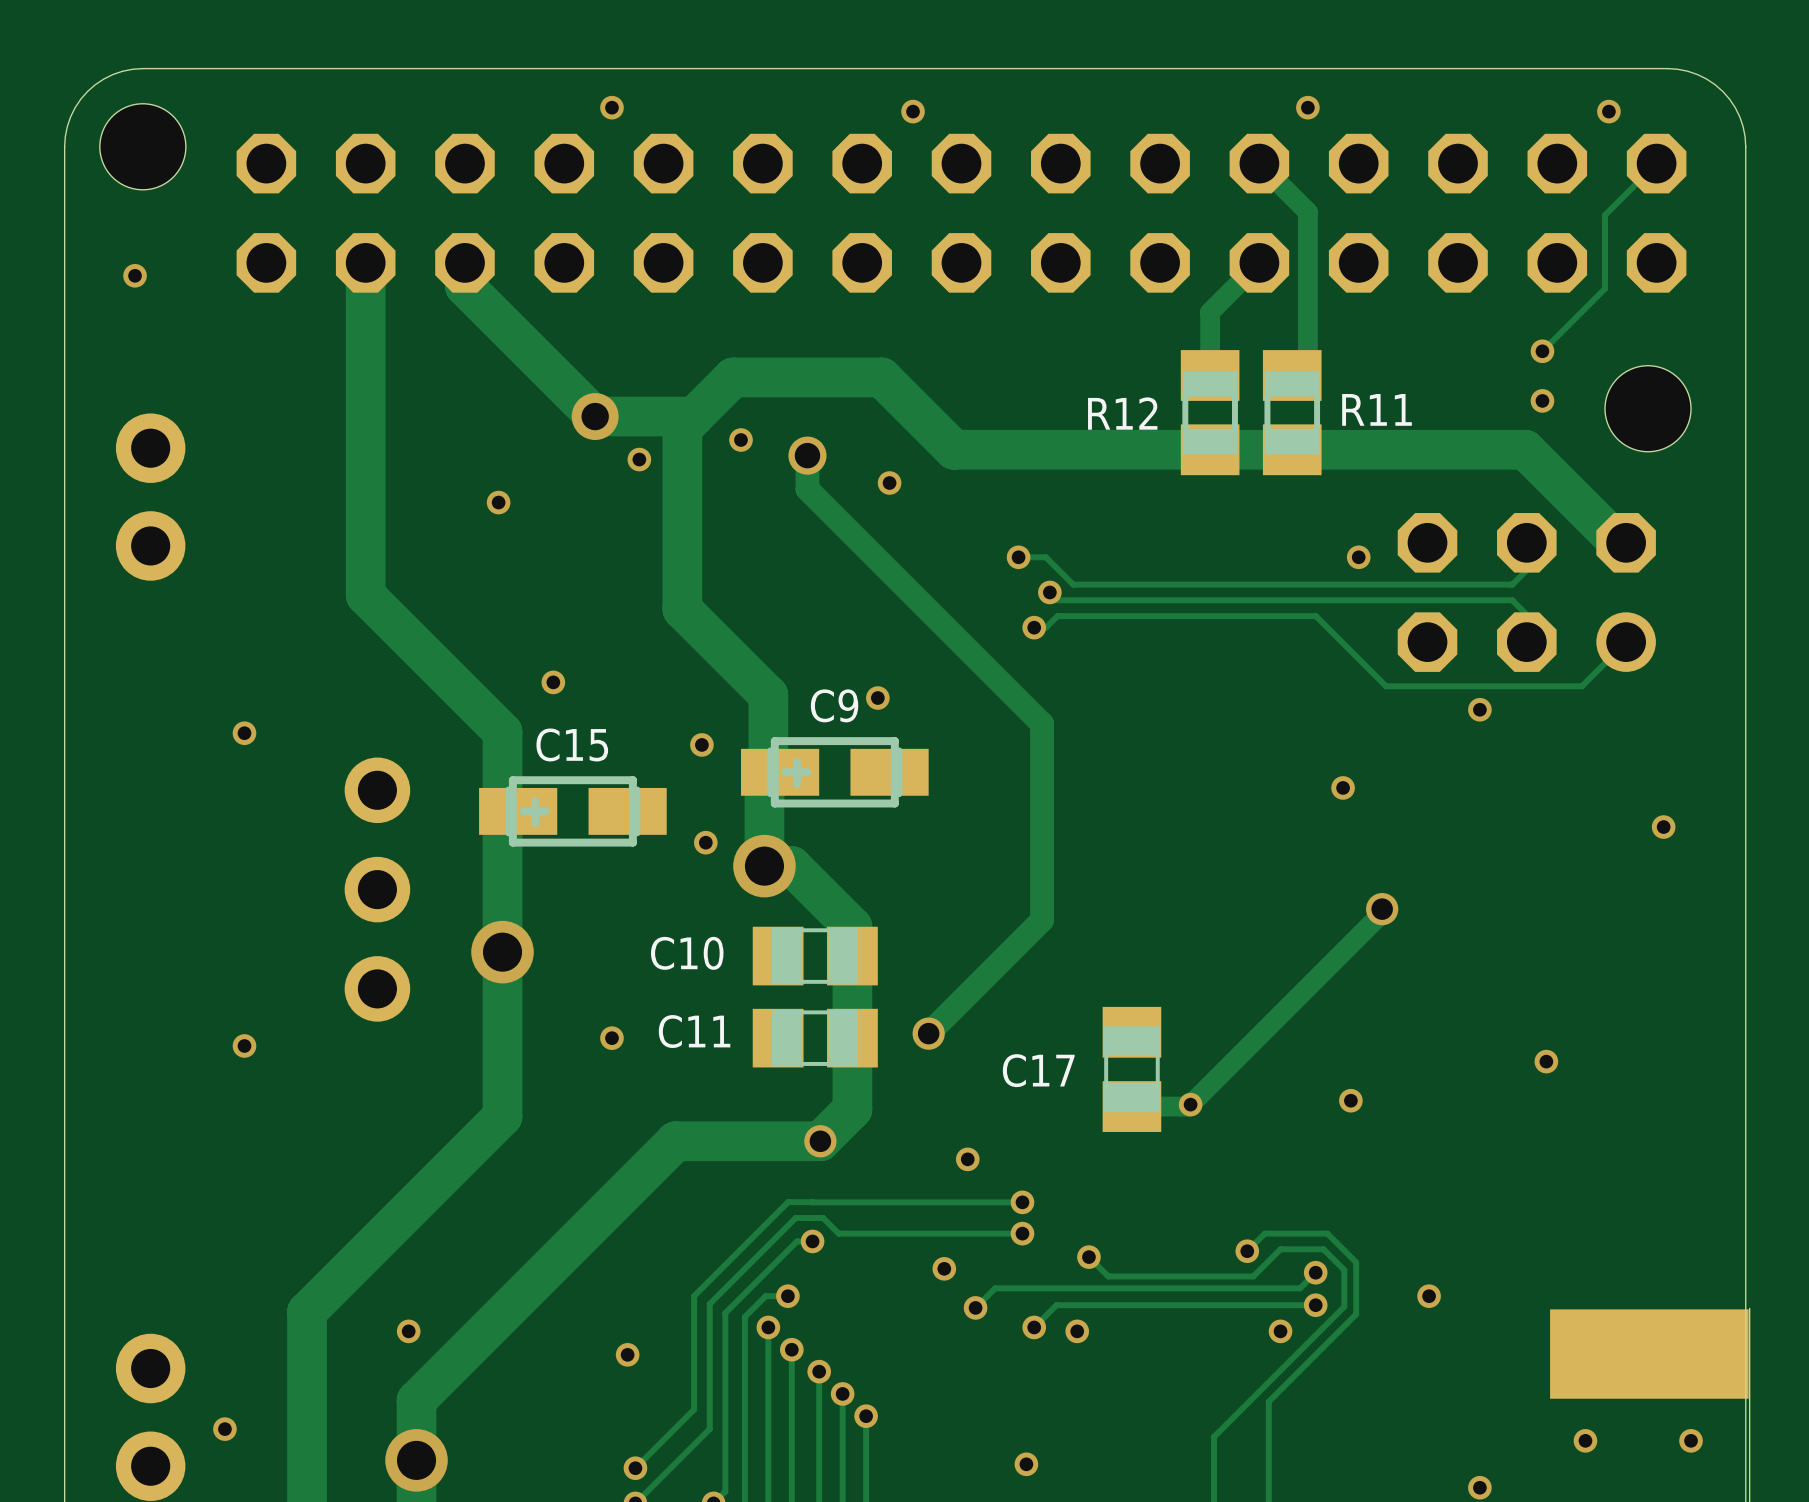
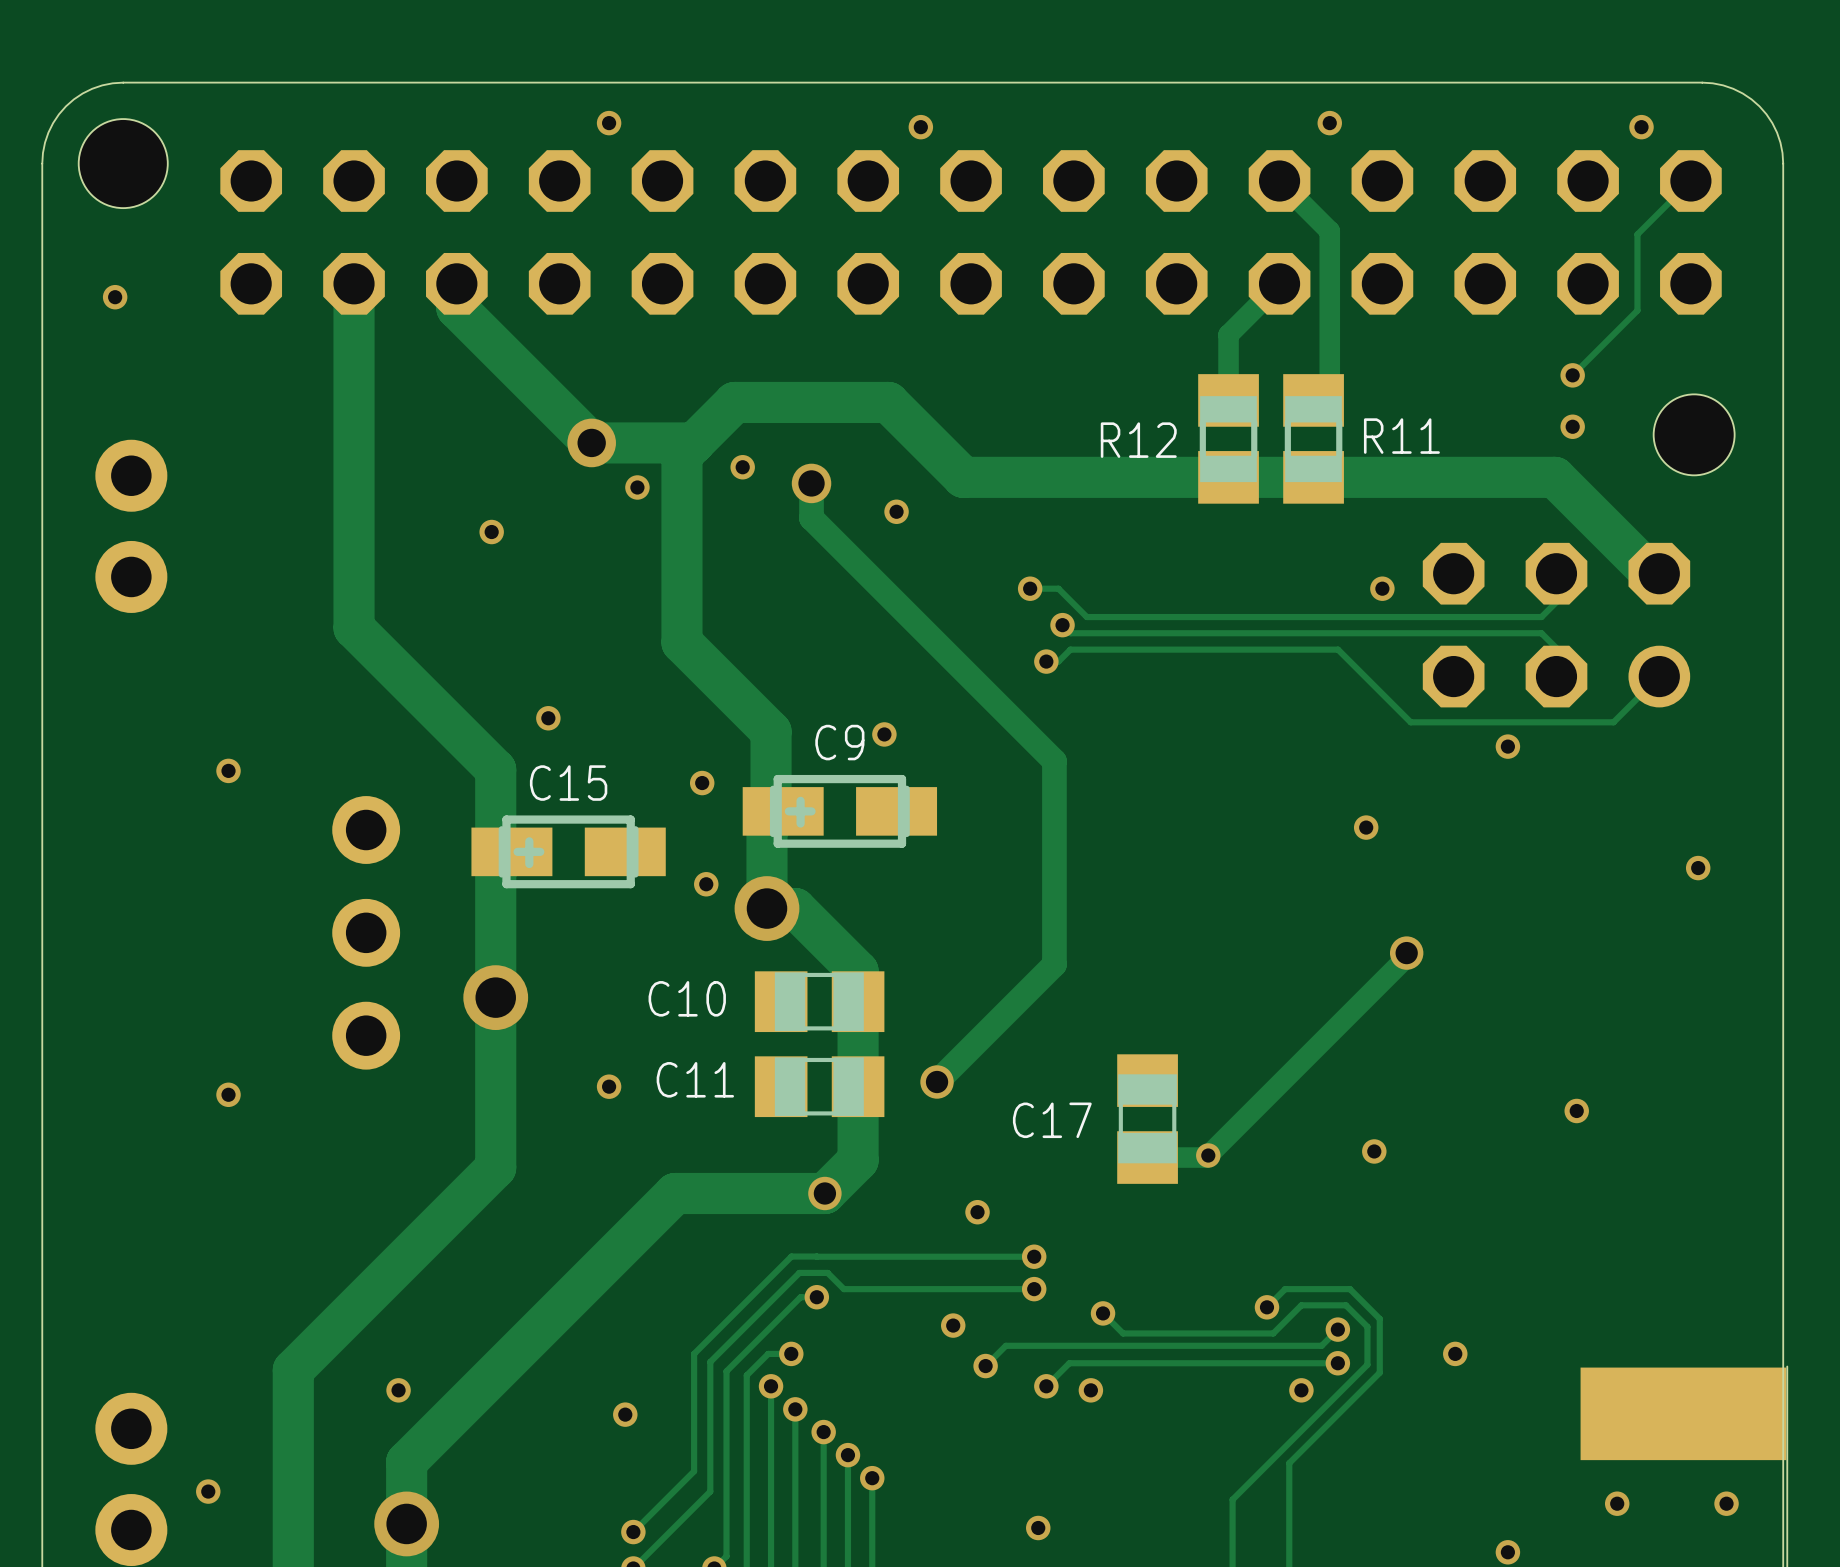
hole size: [1605, 365, 1692, 452] -> [1653, 394, 1735, 476]

